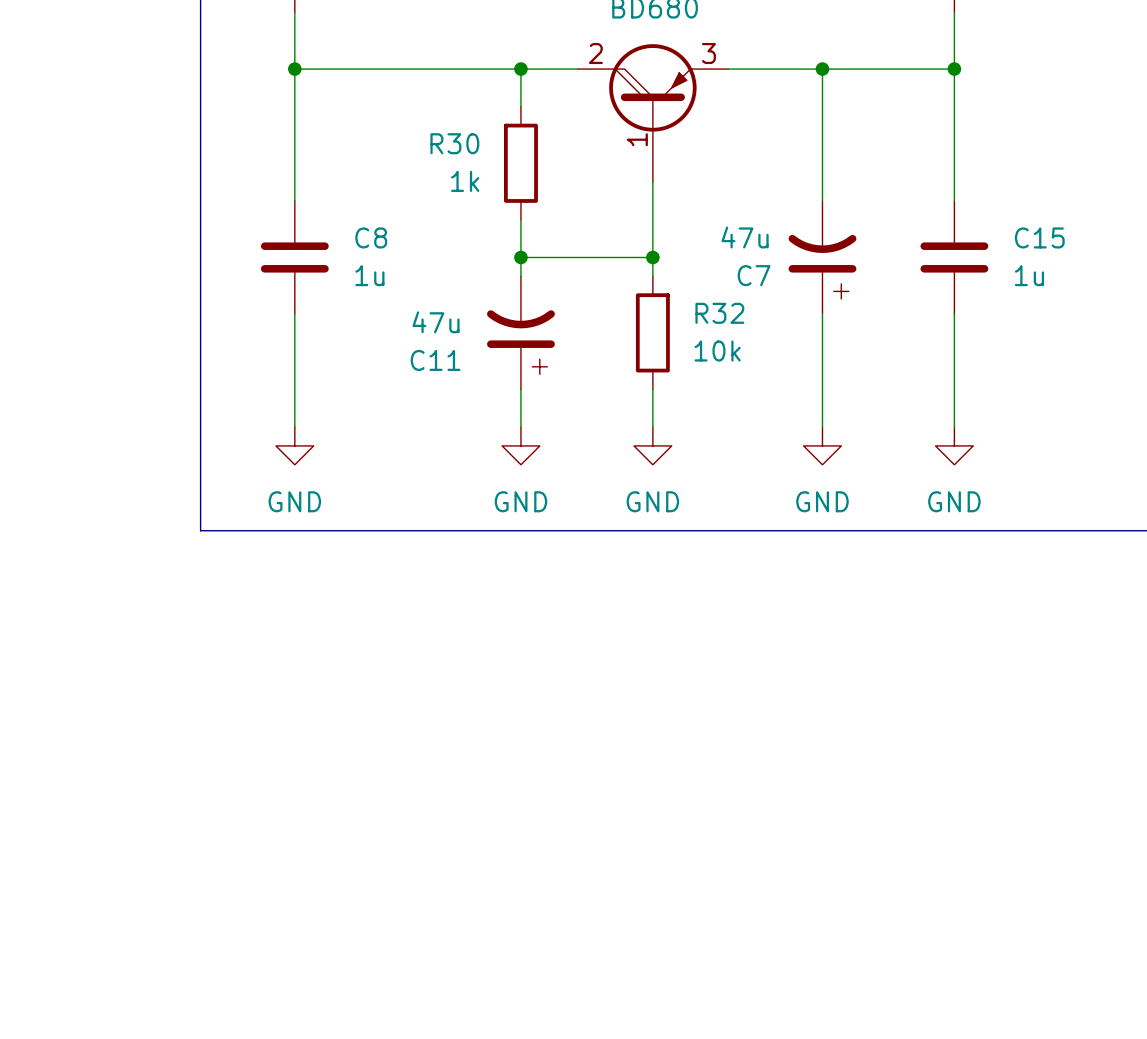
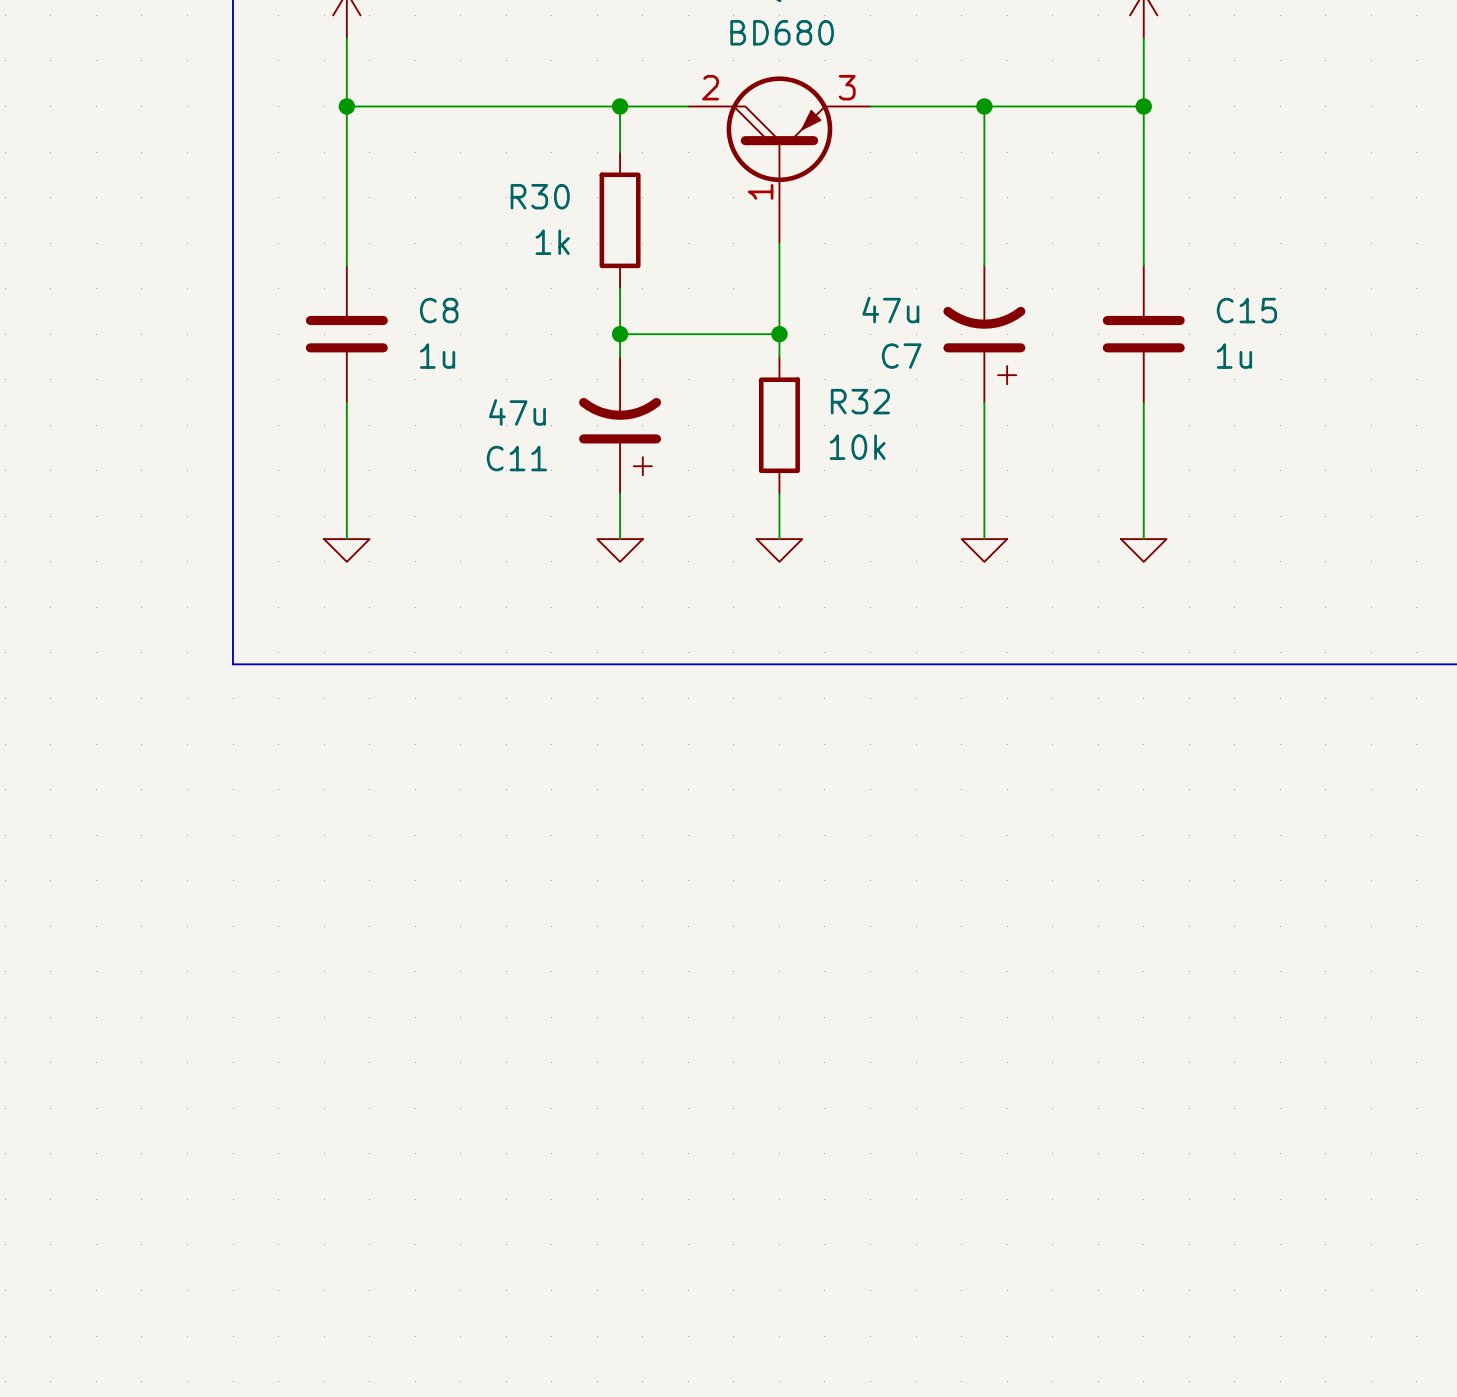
power symbol shape: [275, 427, 314, 465] -> [324, 539, 370, 562]
power symbol shape: [502, 427, 540, 465] -> [597, 539, 643, 562]
power symbol shape: [634, 427, 672, 465] -> [756, 539, 803, 562]
power symbol shape: [803, 427, 842, 465] -> [961, 539, 1008, 562]
power symbol shape: [935, 427, 974, 465] -> [1120, 539, 1167, 562]
power symbol text: GND (294, 501) -> none
power symbol text: GND (520, 501) -> none
power symbol text: GND (652, 501) -> none
power symbol text: GND (822, 501) -> none
power symbol text: GND (954, 501) -> none

